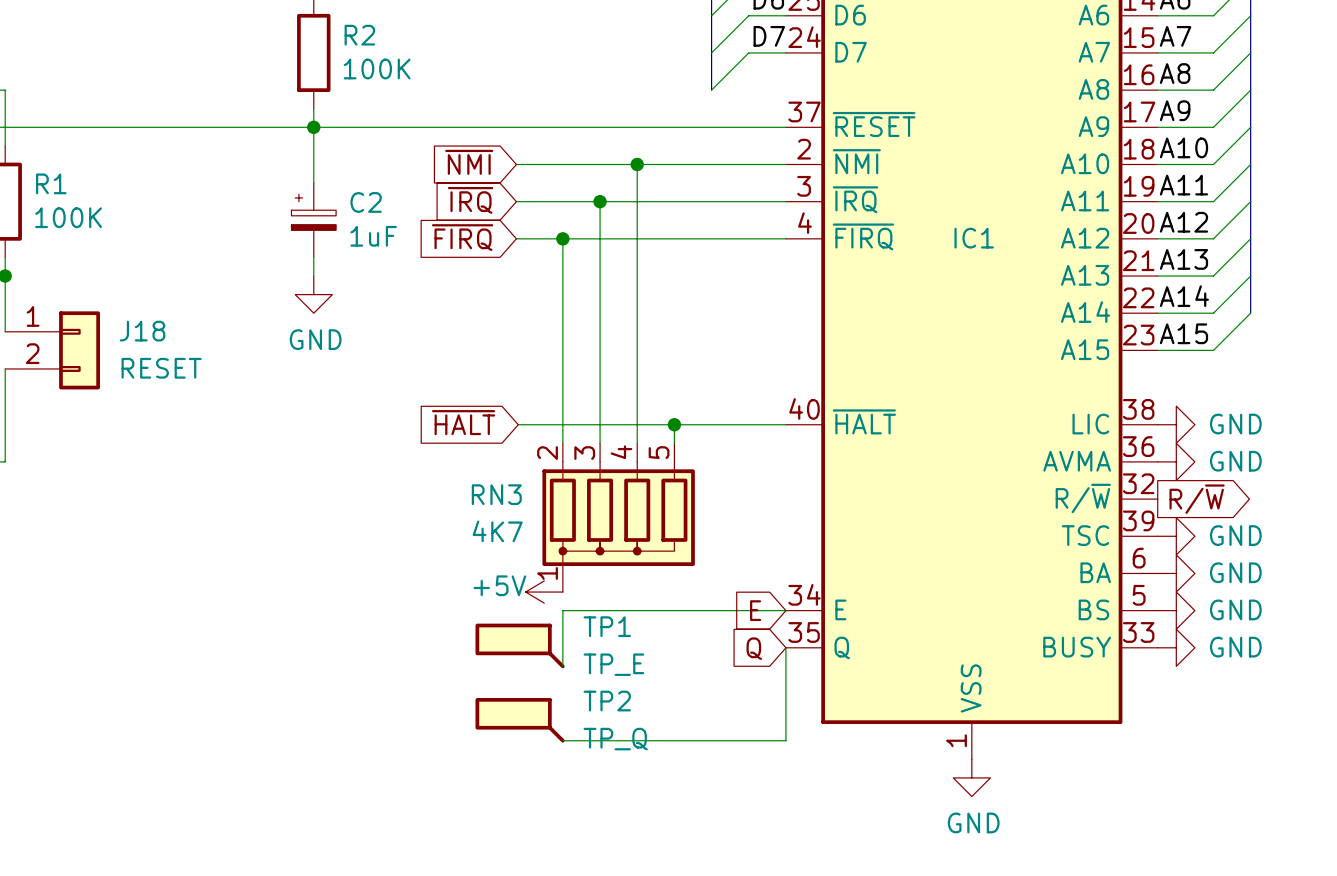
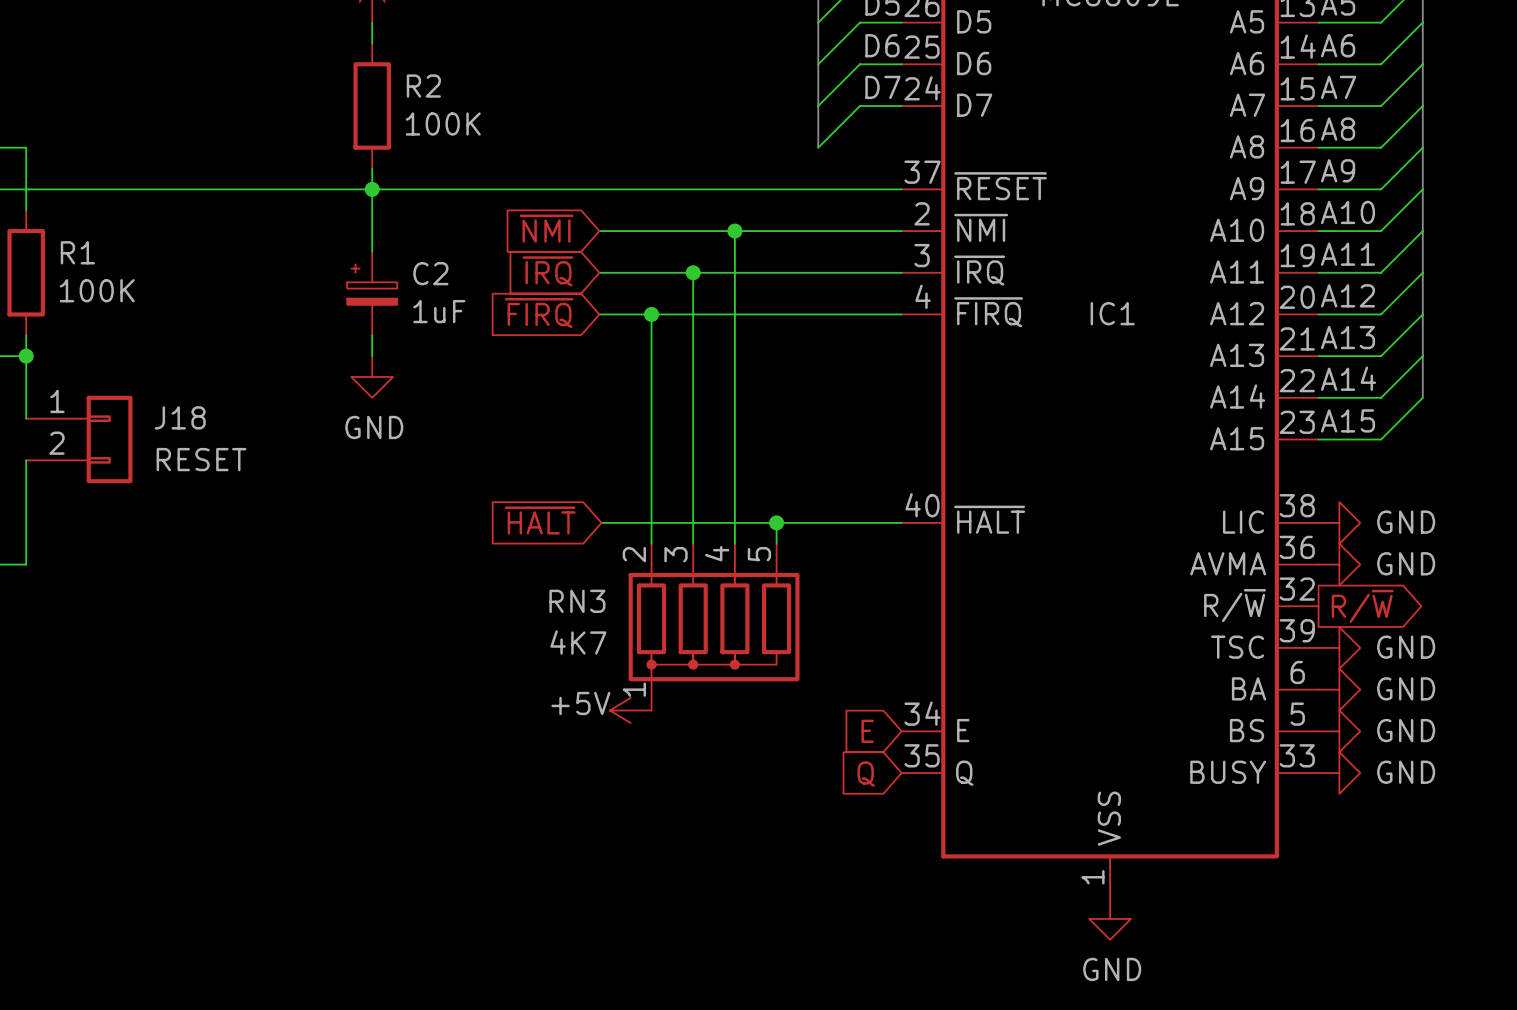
wire: (785, 610) (562, 610) (562, 666) -> none
TP1: TP_E (520, 645) -> none
wire: (785, 647) (785, 740) (562, 740) -> none
TP2: TP_Q (520, 720) -> none

